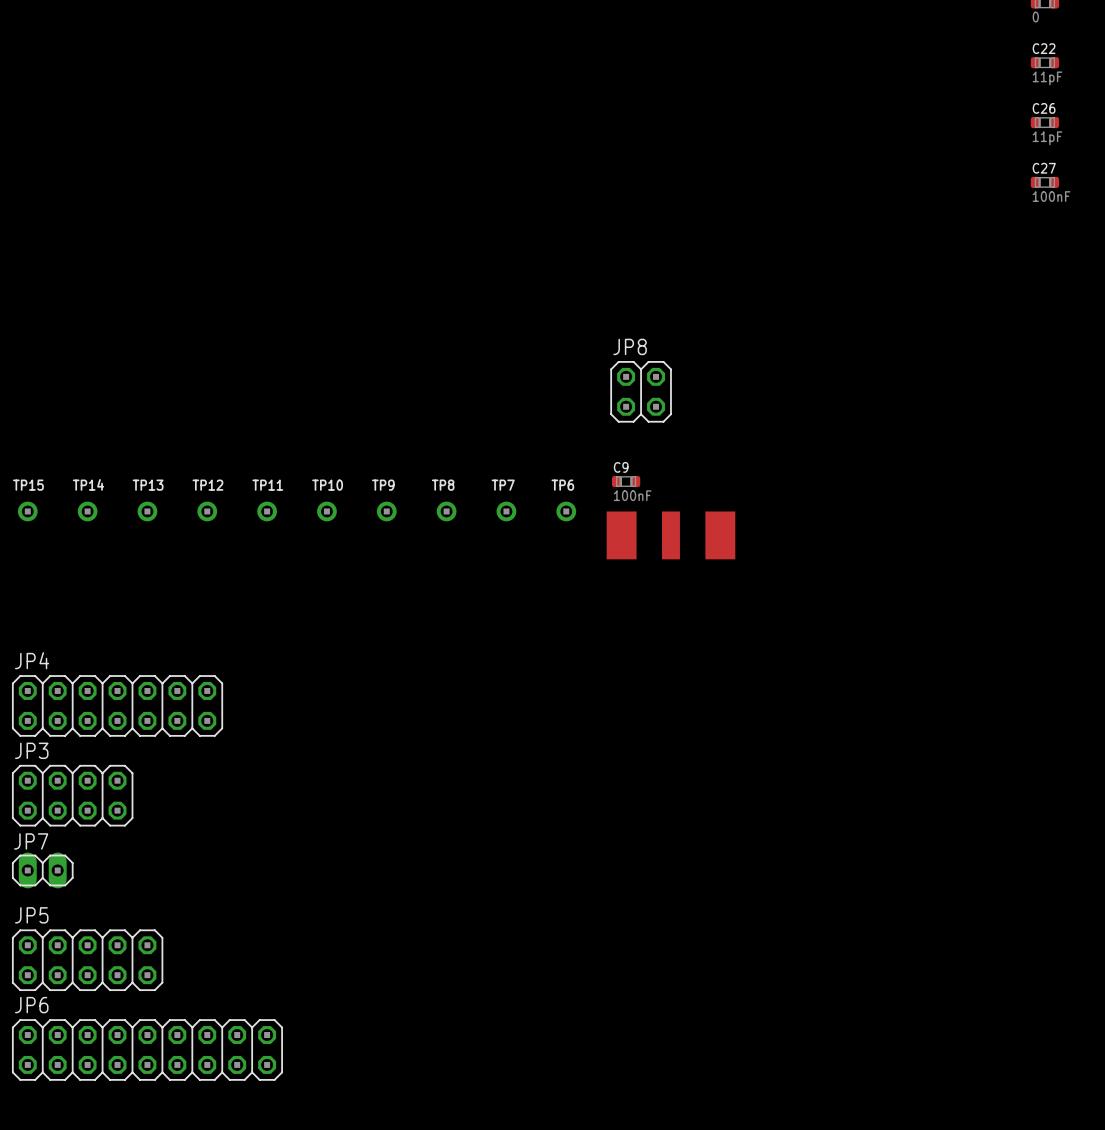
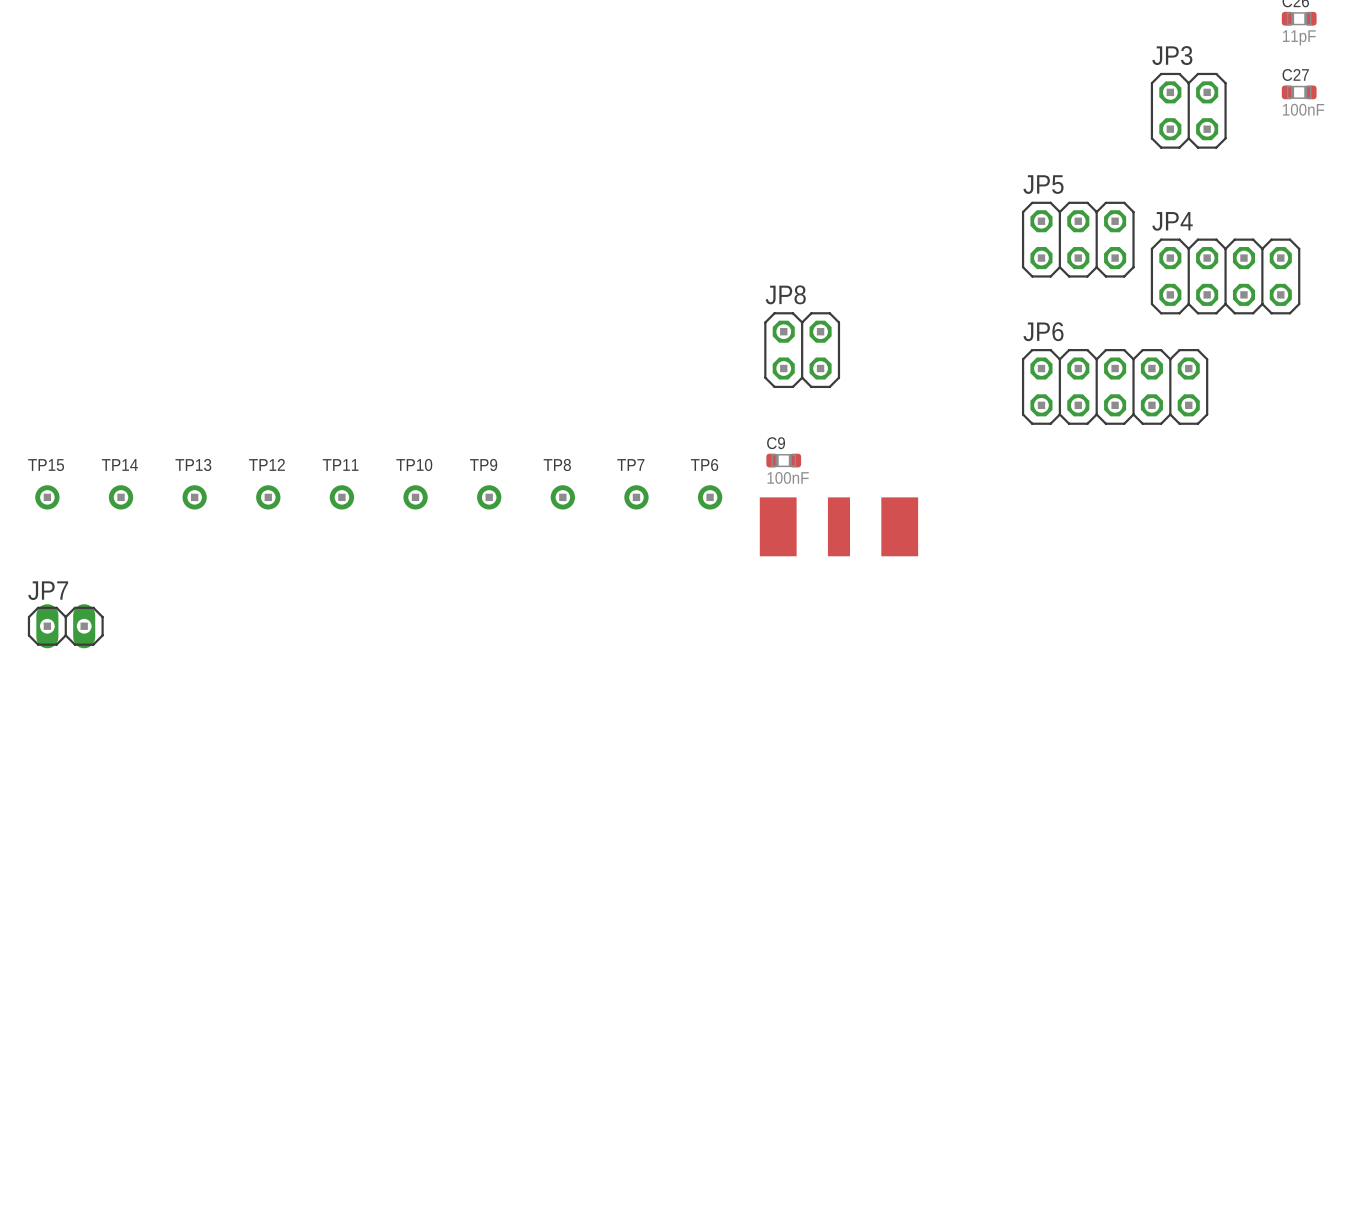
JP4 name position: JP4 (32, 660) -> JP4 (1172, 221)
JP4 footprint: [11, 675, 224, 737] -> [1150, 238, 1301, 315]
JP3 name position: JP3 (31, 750) -> JP3 (1172, 55)
JP3 footprint: [11, 764, 134, 827] -> [1150, 72, 1227, 149]
JP7 position: (42, 870) -> (65, 626)
JP5 name position: JP5 (31, 915) -> JP5 (1043, 184)
JP5 footprint: [11, 929, 164, 992] -> [1021, 201, 1135, 278]
JP6 name position: JP6 (31, 1005) -> JP6 (1043, 331)
JP6 footprint: [11, 1019, 283, 1081] -> [1021, 349, 1209, 425]

